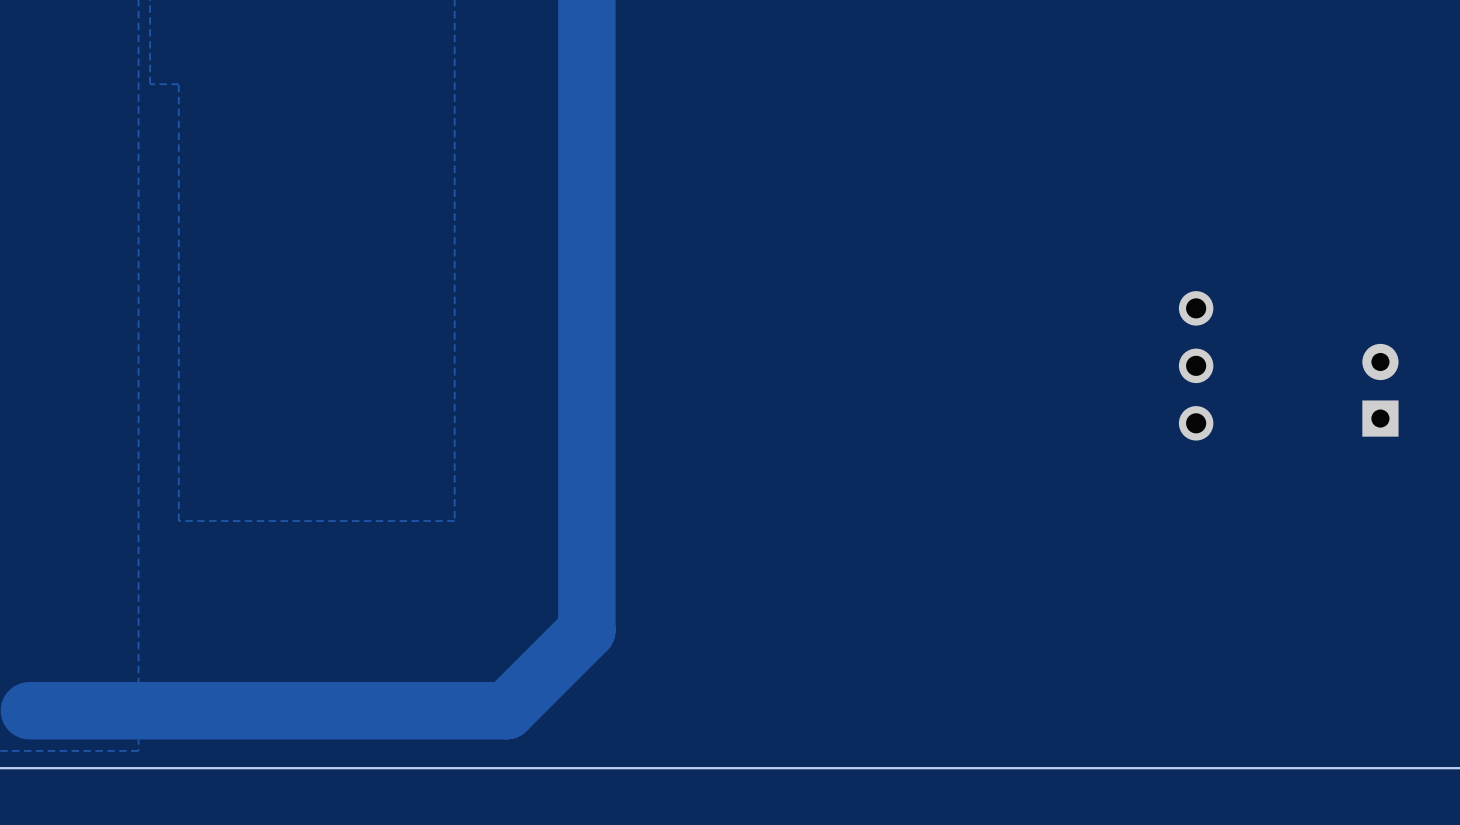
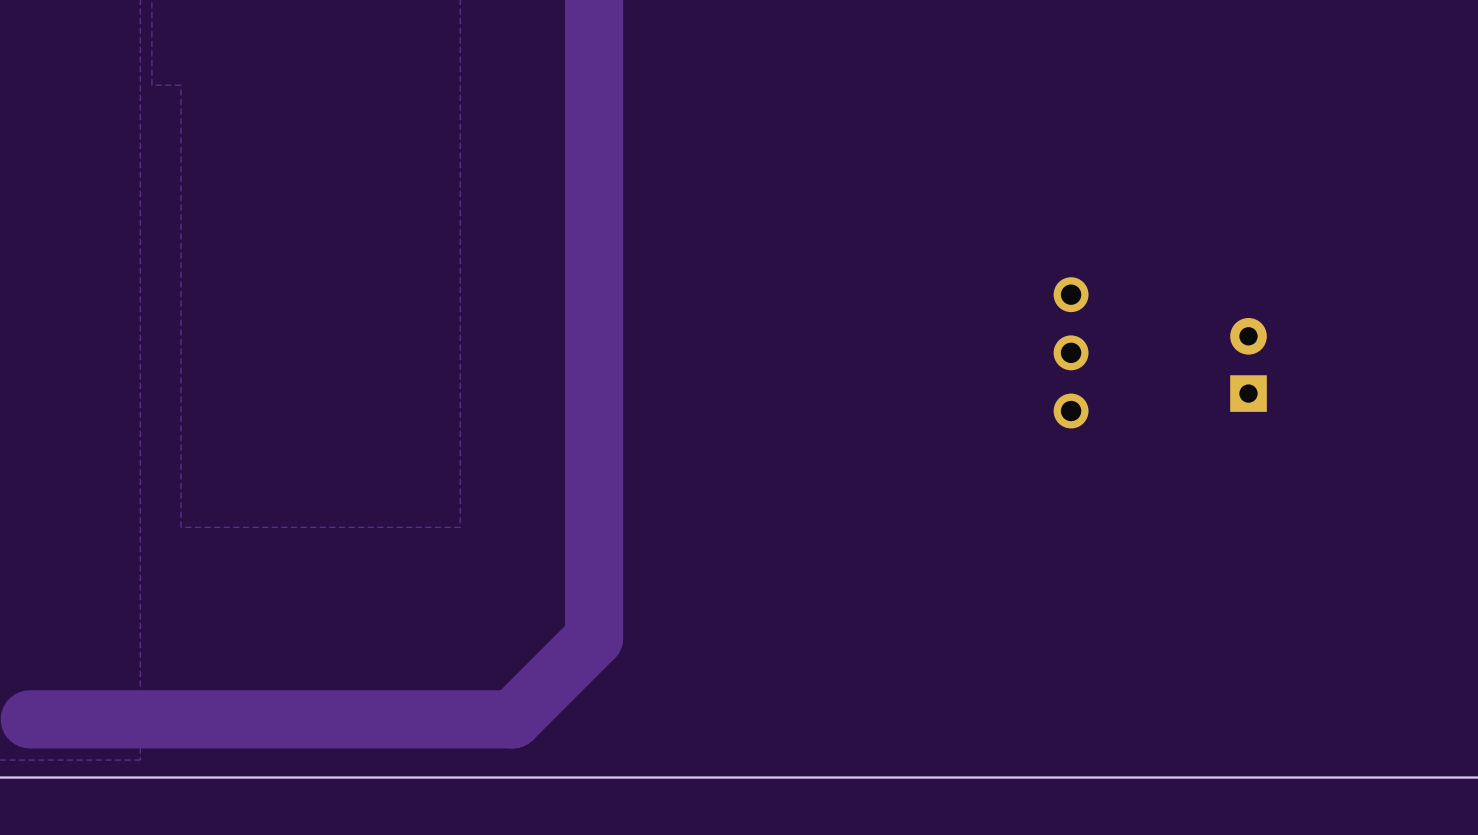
part position: (1196, 365) -> (1071, 352)
part position: (1380, 390) -> (1248, 364)

